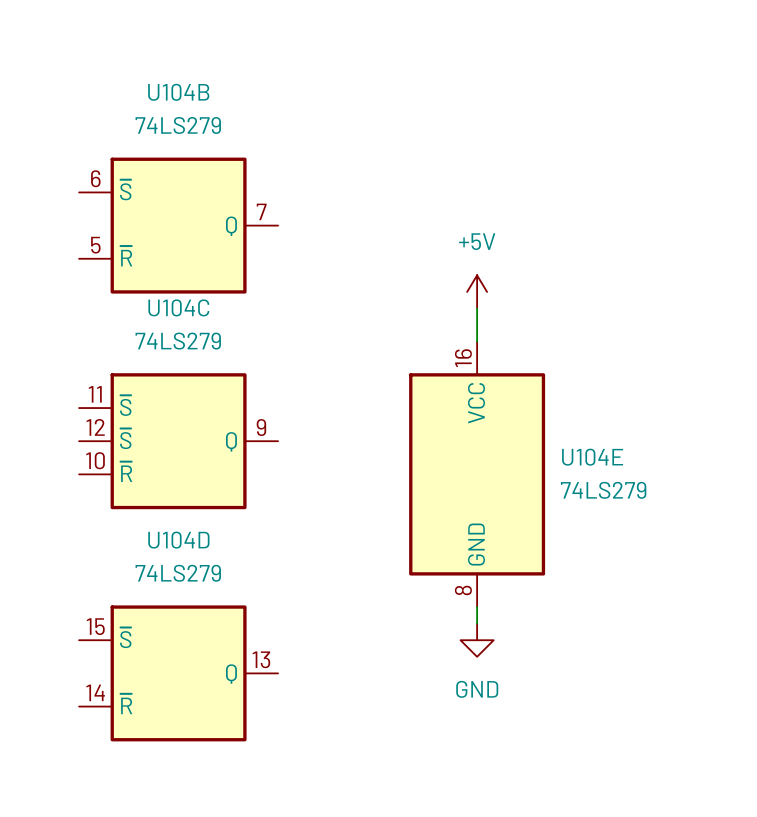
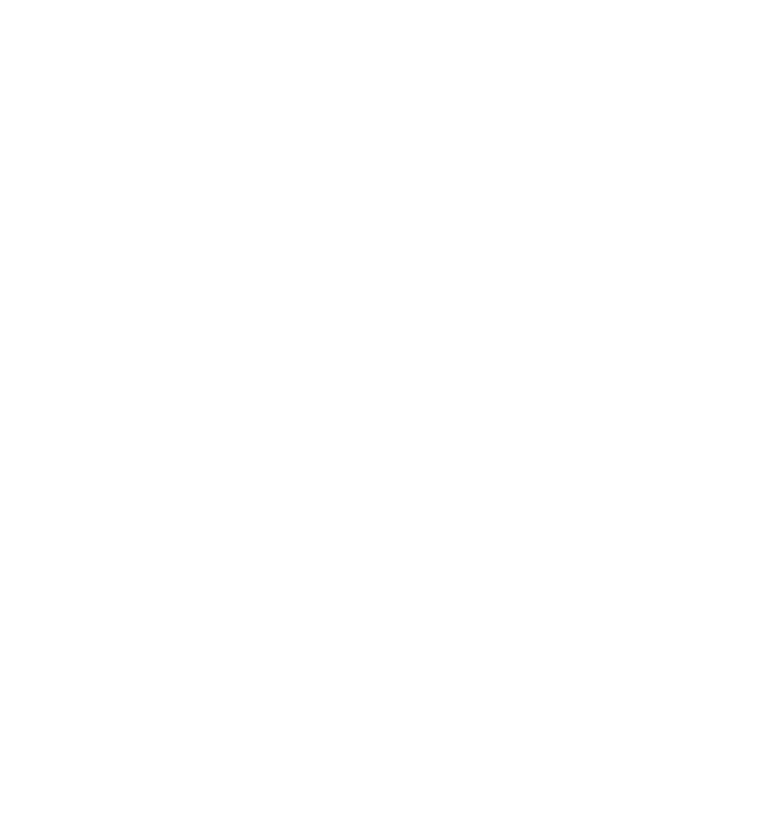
U104B: 74LS279 (178, 225) -> none
power symbol: +5V (477, 291) -> none
wire: (477, 308) (477, 341) -> none
U104C: 74LS279 (178, 441) -> none
U104E: 74LS279 (477, 474) -> none
wire: (477, 607) (477, 623) -> none
power symbol: GND (477, 640) -> none
U104D: 74LS279 (178, 673) -> none

